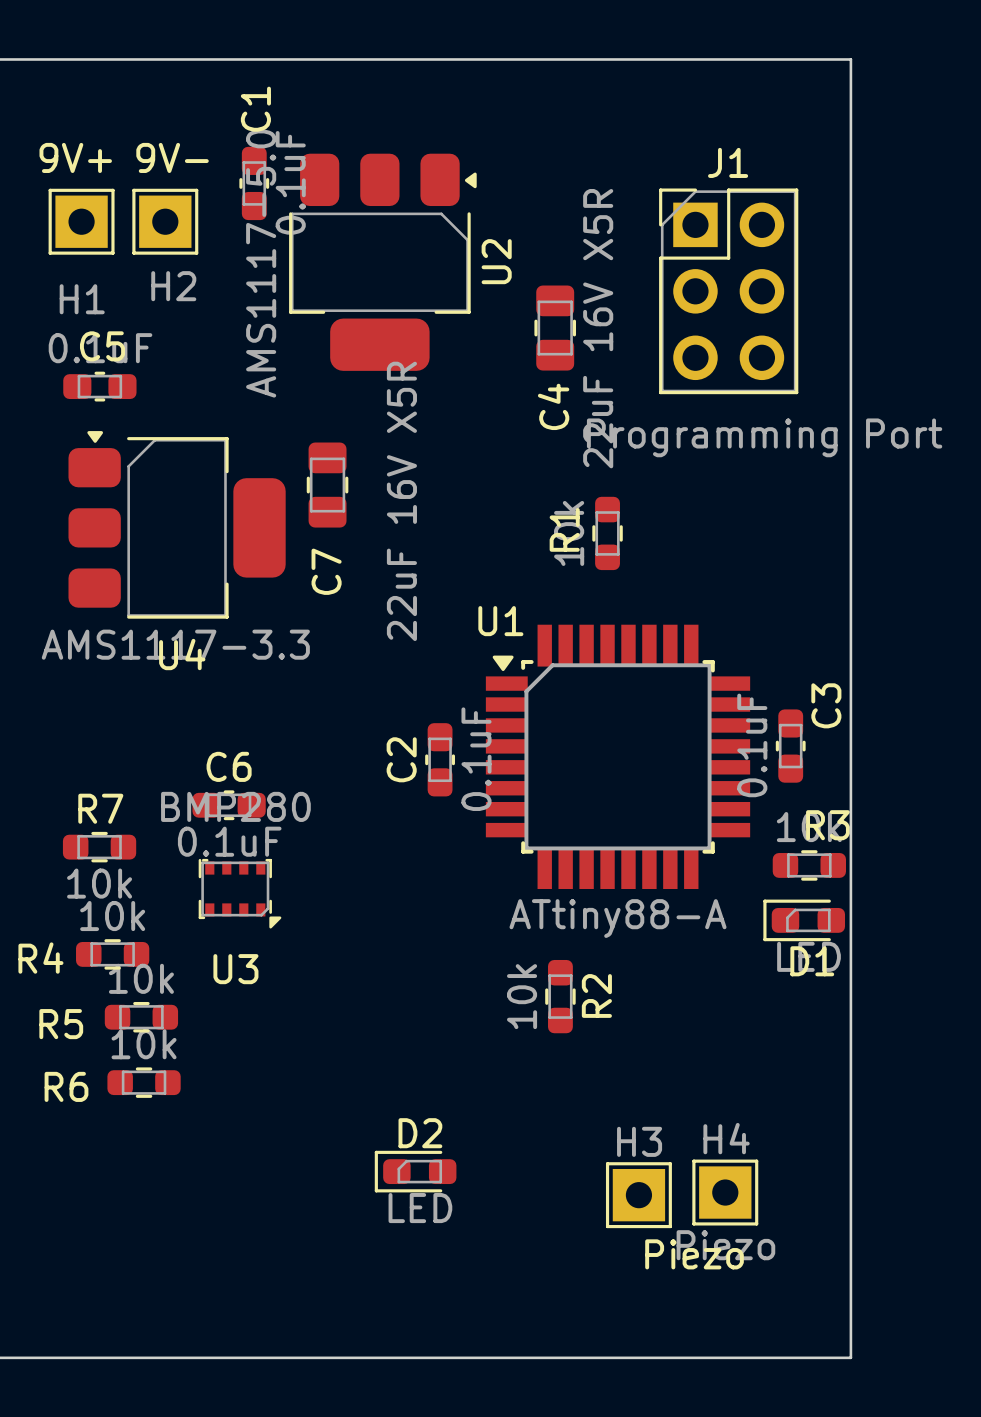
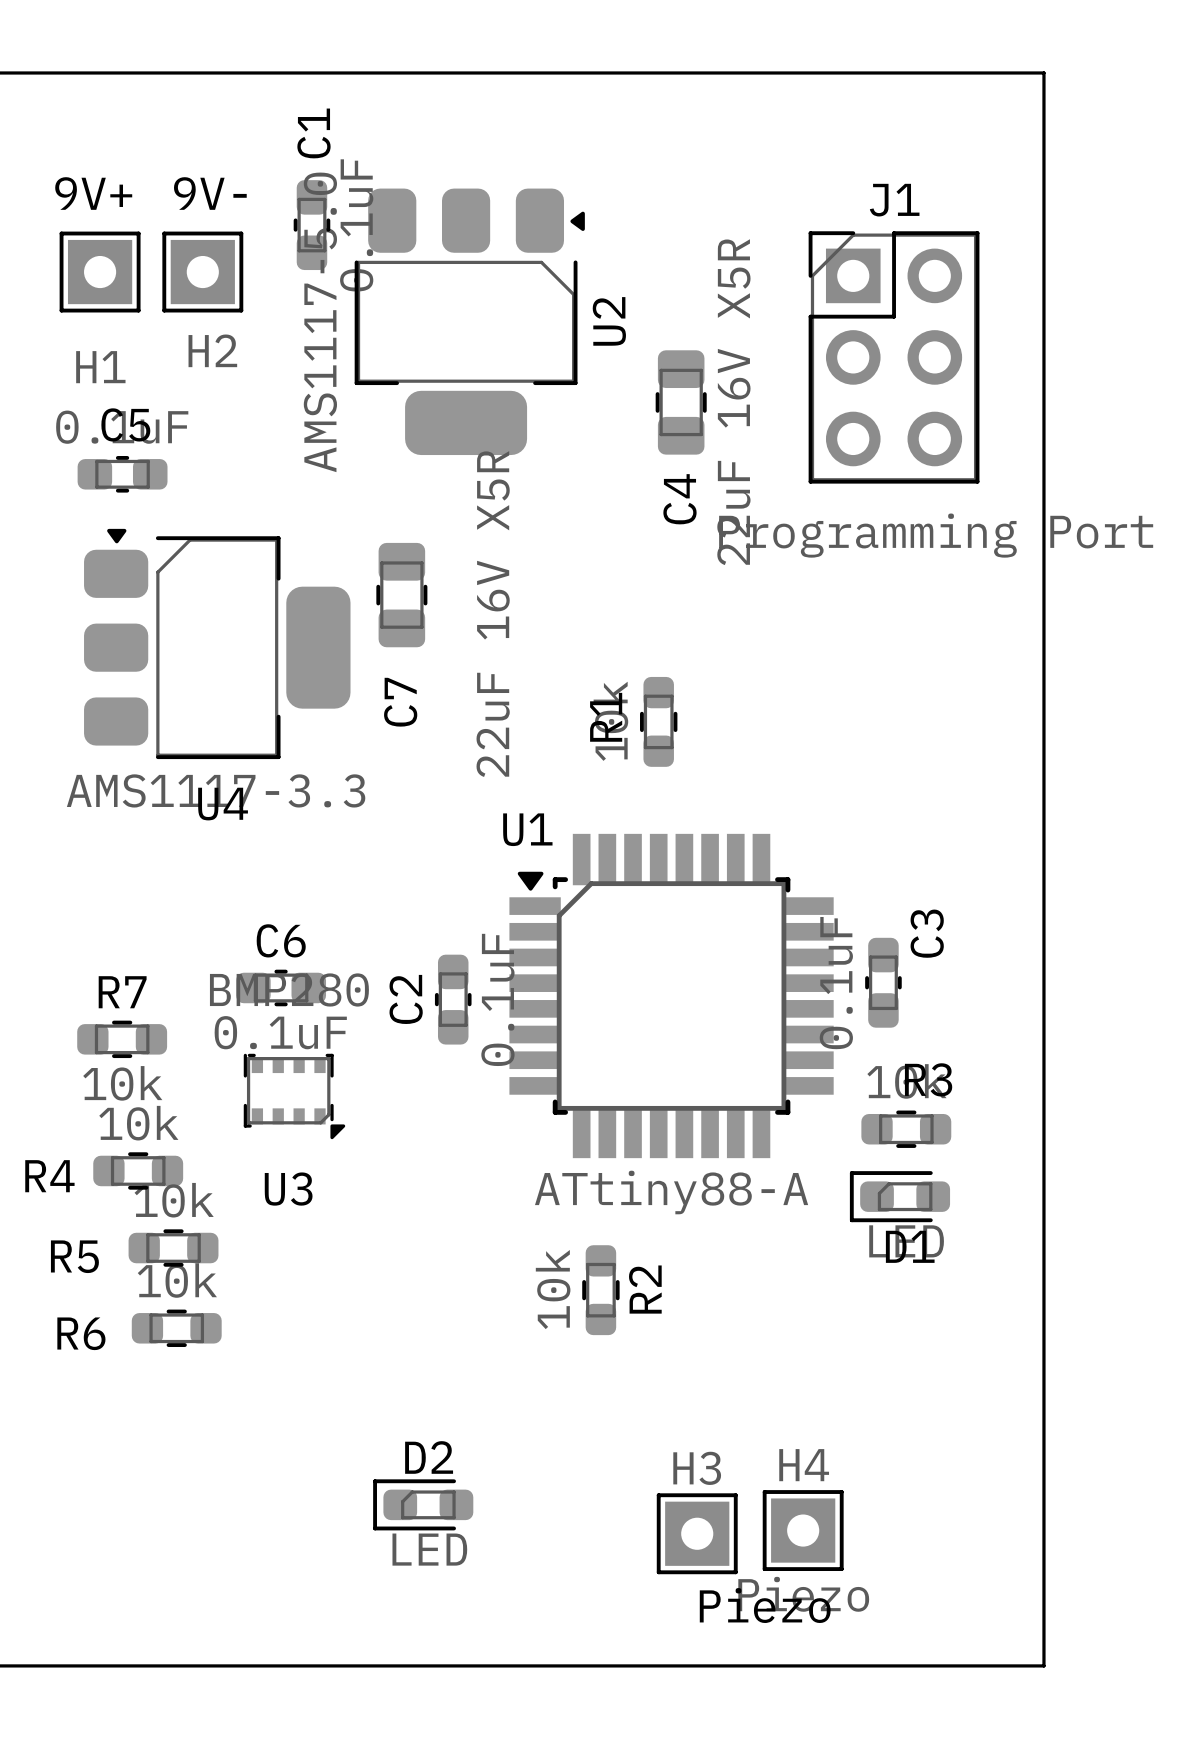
R1 position: (607, 533) -> (658, 721)
C3 position: (790, 746) -> (883, 982)
U1 position: (618, 756) -> (671, 996)
C2 position: (440, 759) -> (453, 999)
R3 position: (809, 865) -> (906, 1129)
D1 position: (804, 920) -> (899, 1196)
R2 position: (560, 996) -> (600, 1290)
D2 position: (415, 1171) -> (423, 1504)
H4 position: (725, 1192) -> (803, 1530)
H3 position: (638, 1195) -> (697, 1533)

